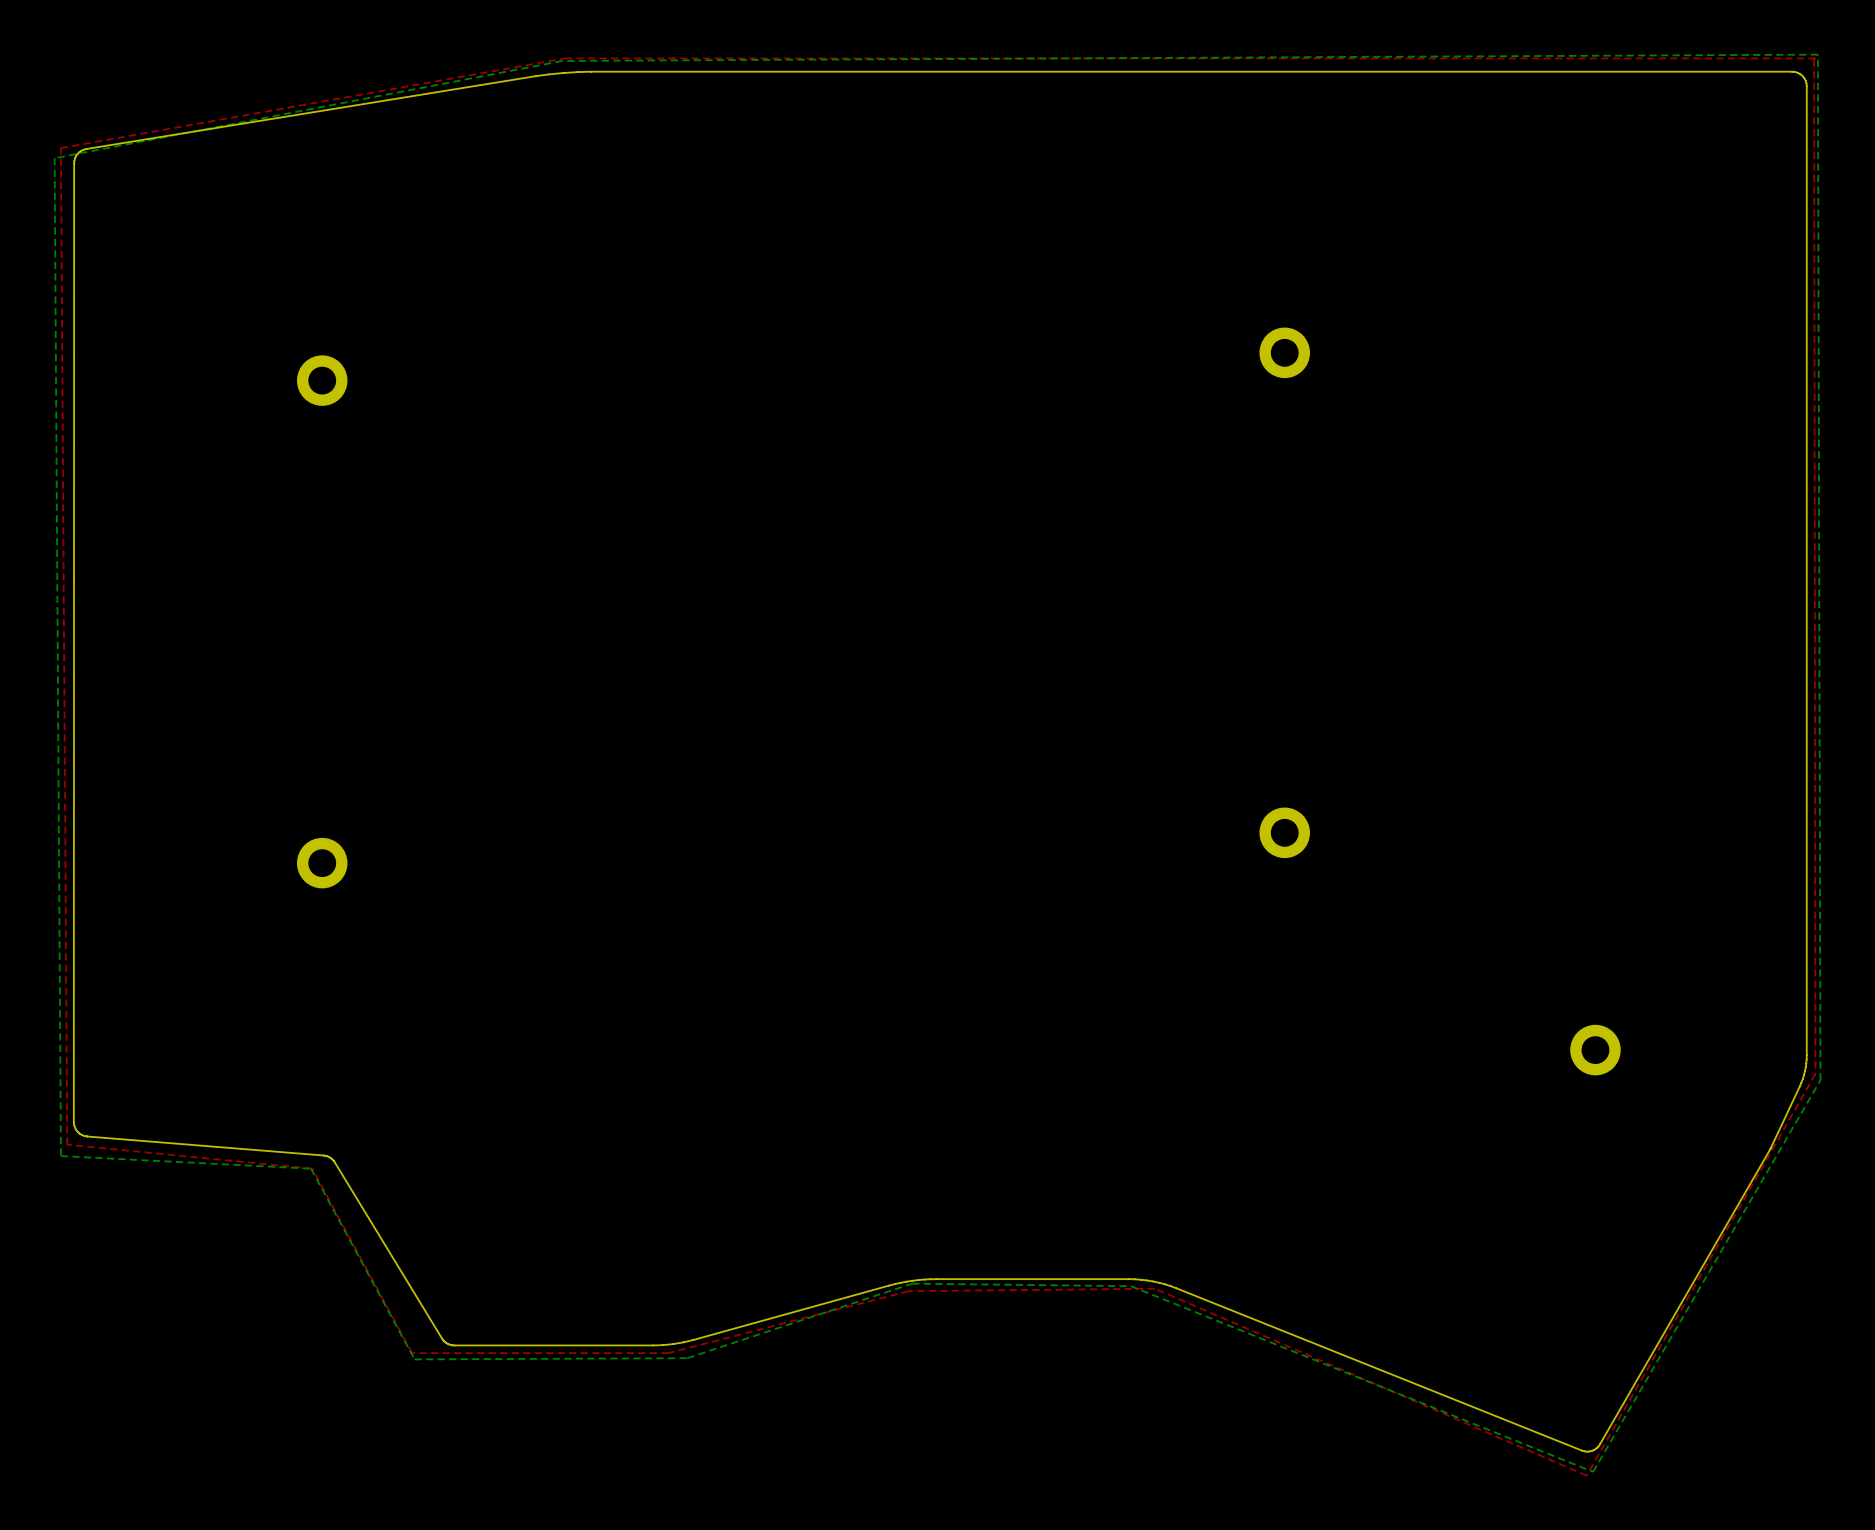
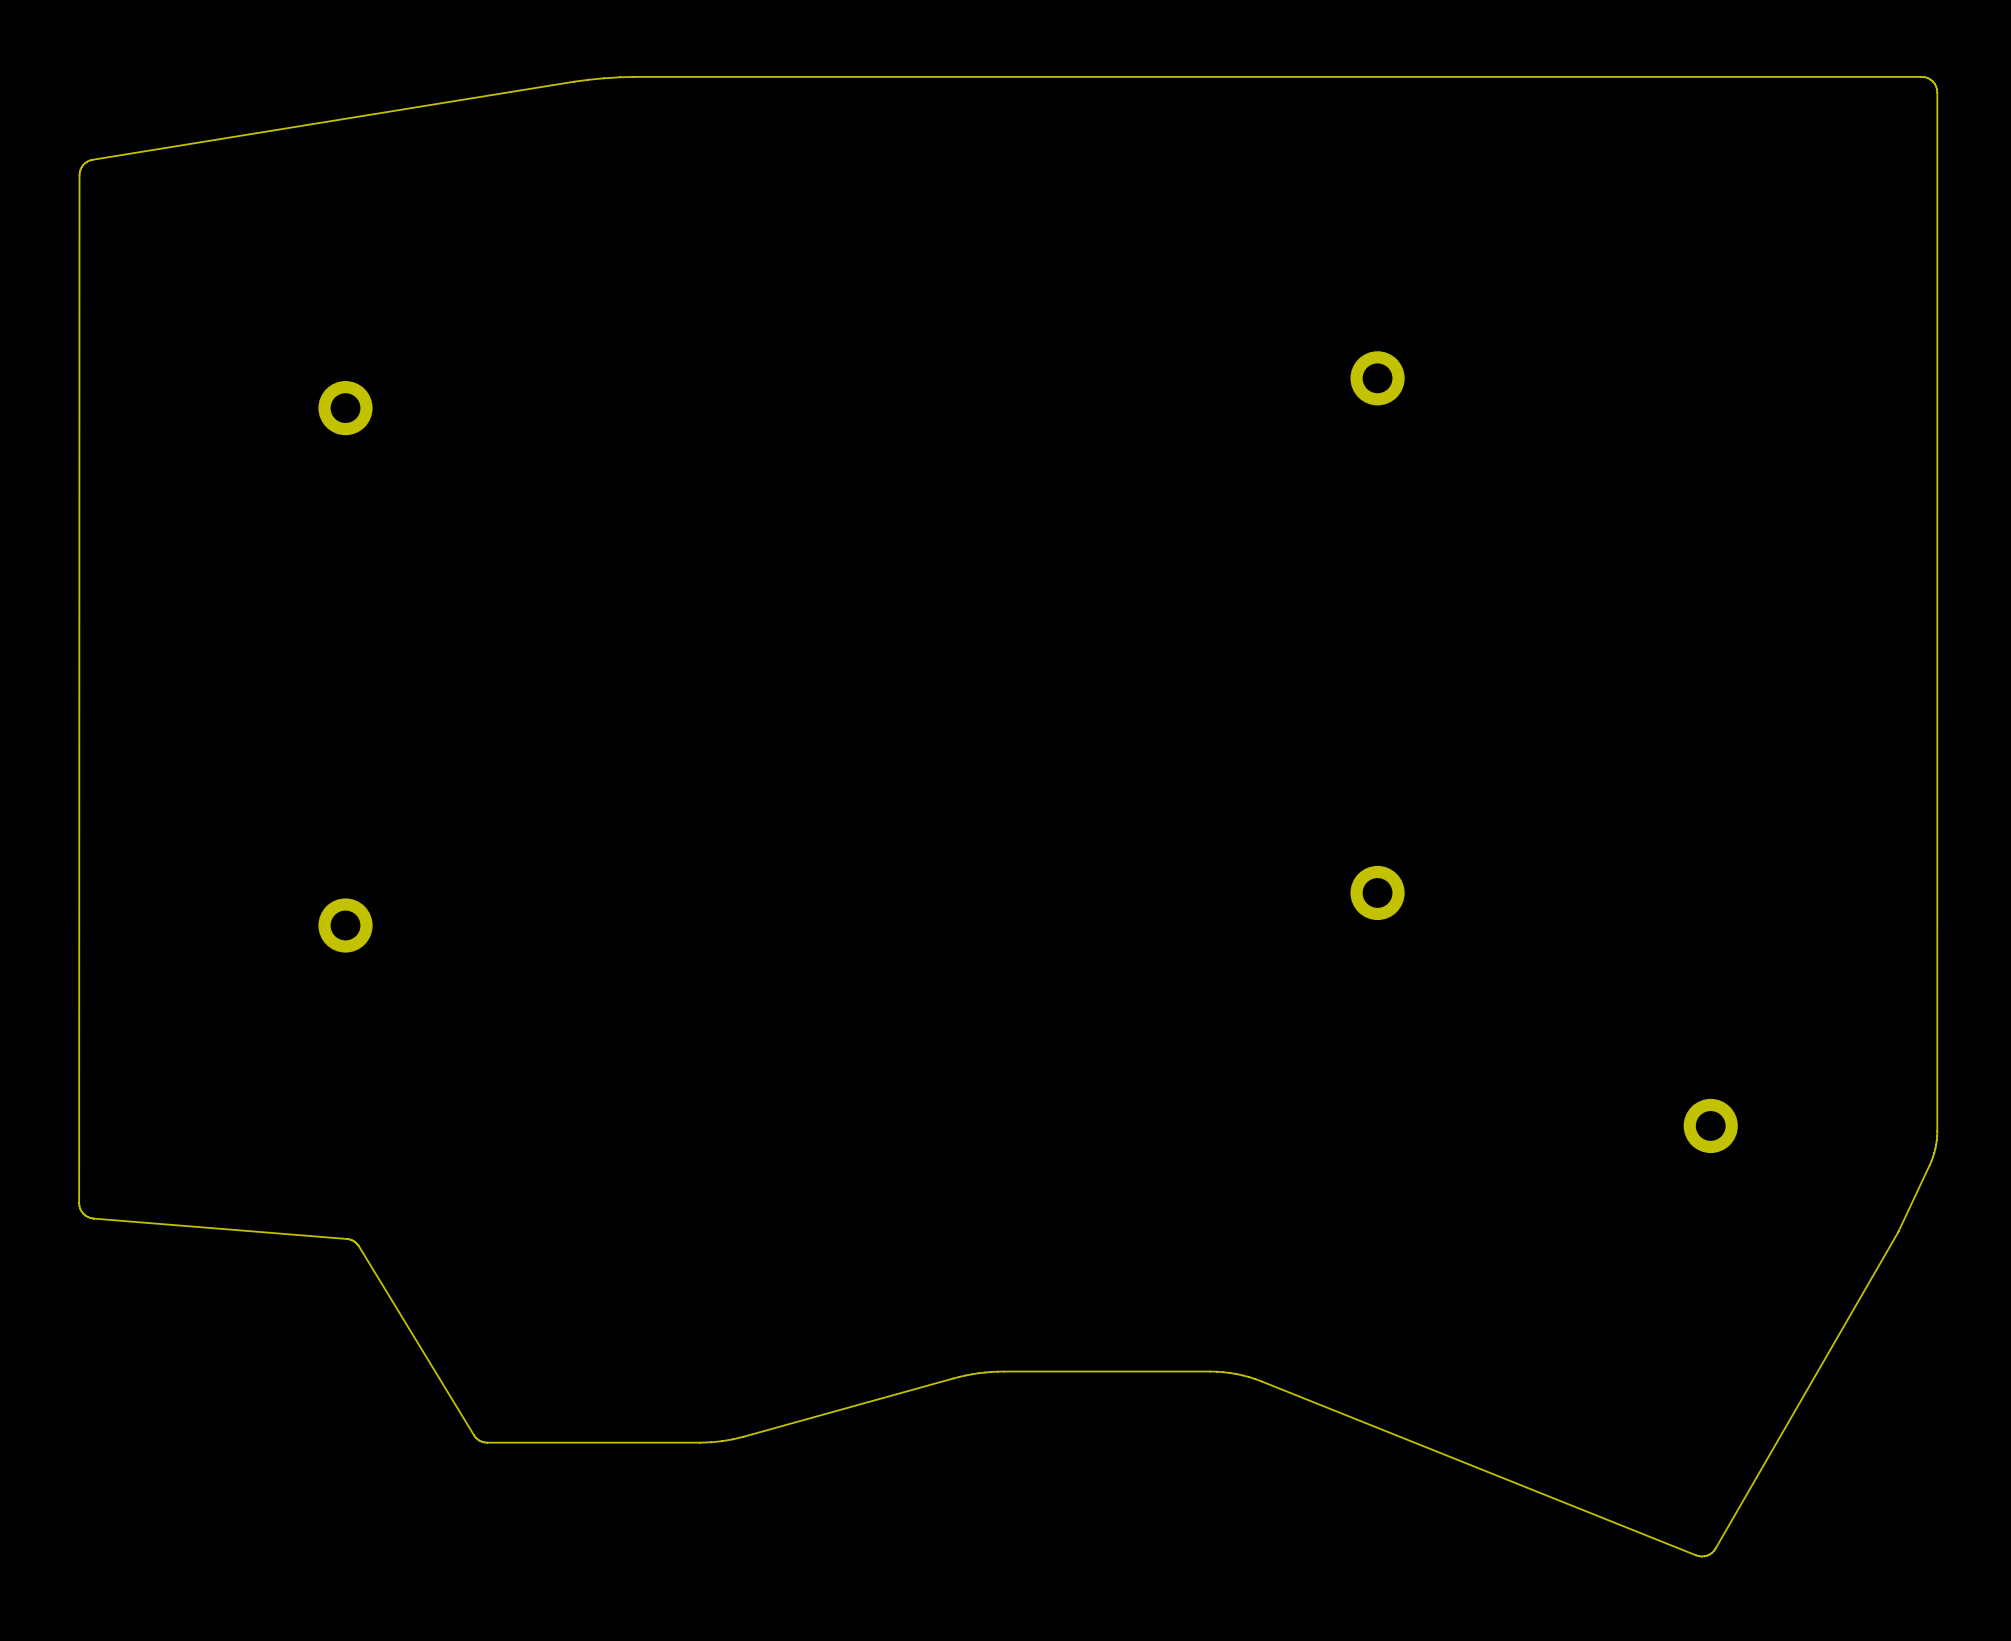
bottom zone outline: (1817, 54) (562, 60) (54, 158) (60, 1156) (311, 1168) (414, 1359) (687, 1358) (912, 1283) (1130, 1286) (1593, 1471) (1820, 1080) (1817, 54) -> none
top zone outline: (1815, 58) (564, 58) (60, 148) (67, 1144) (312, 1168) (412, 1353) (668, 1353) (908, 1291) (1154, 1288) (1586, 1475) (1815, 1073) (1815, 58) -> none

